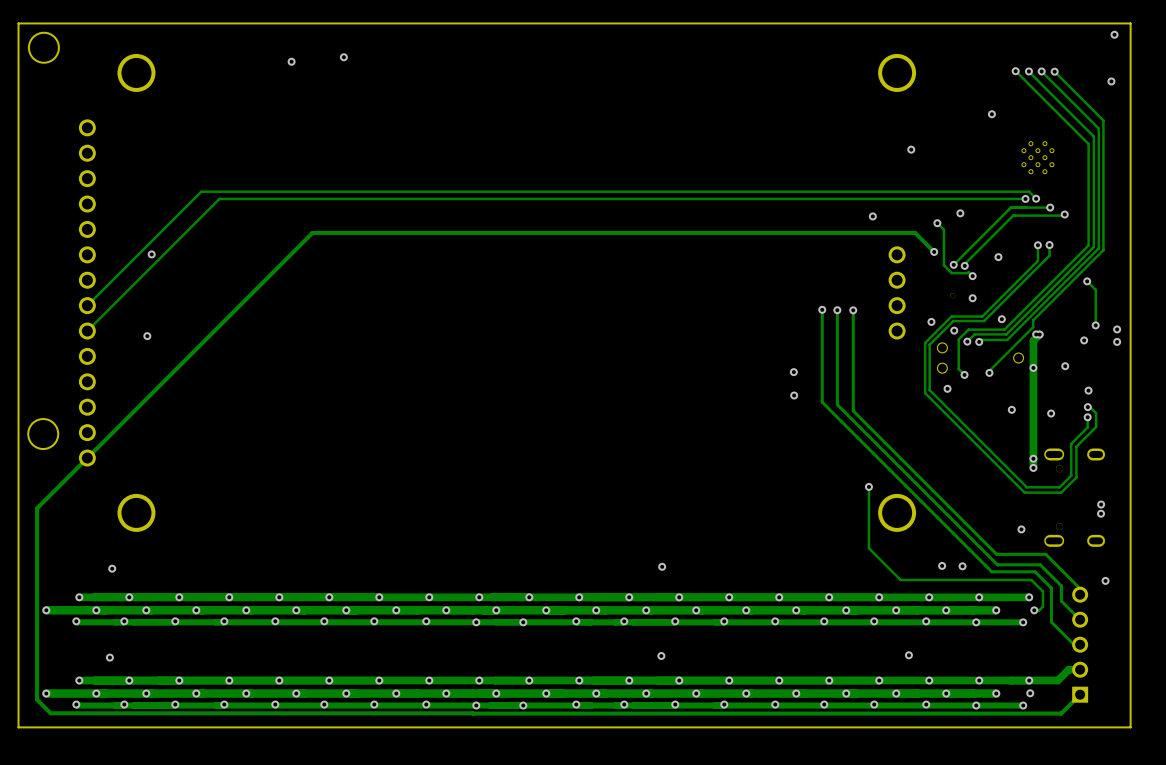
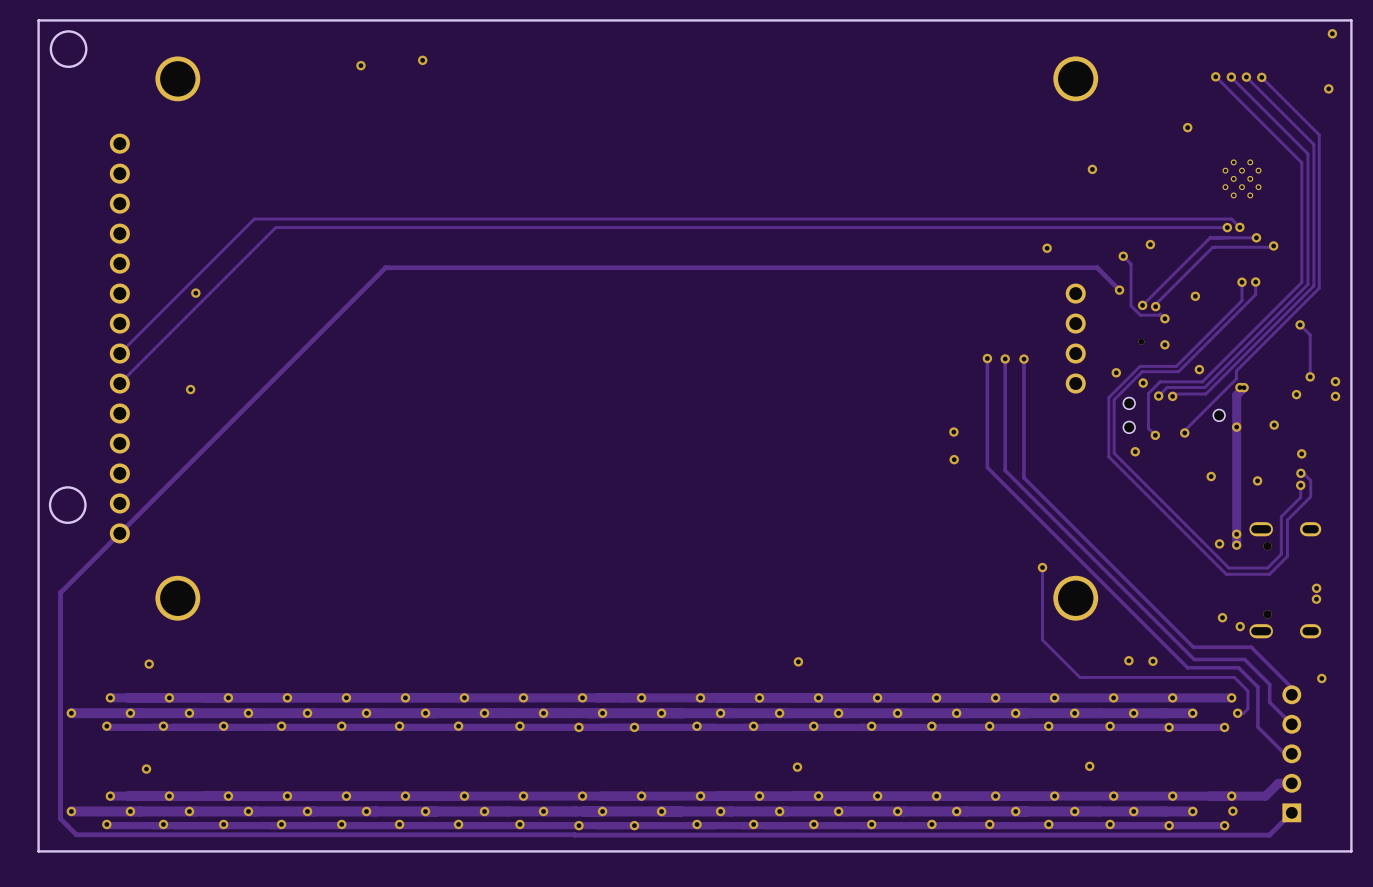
via: none -> (1219, 543)
via: none -> (1240, 626)

